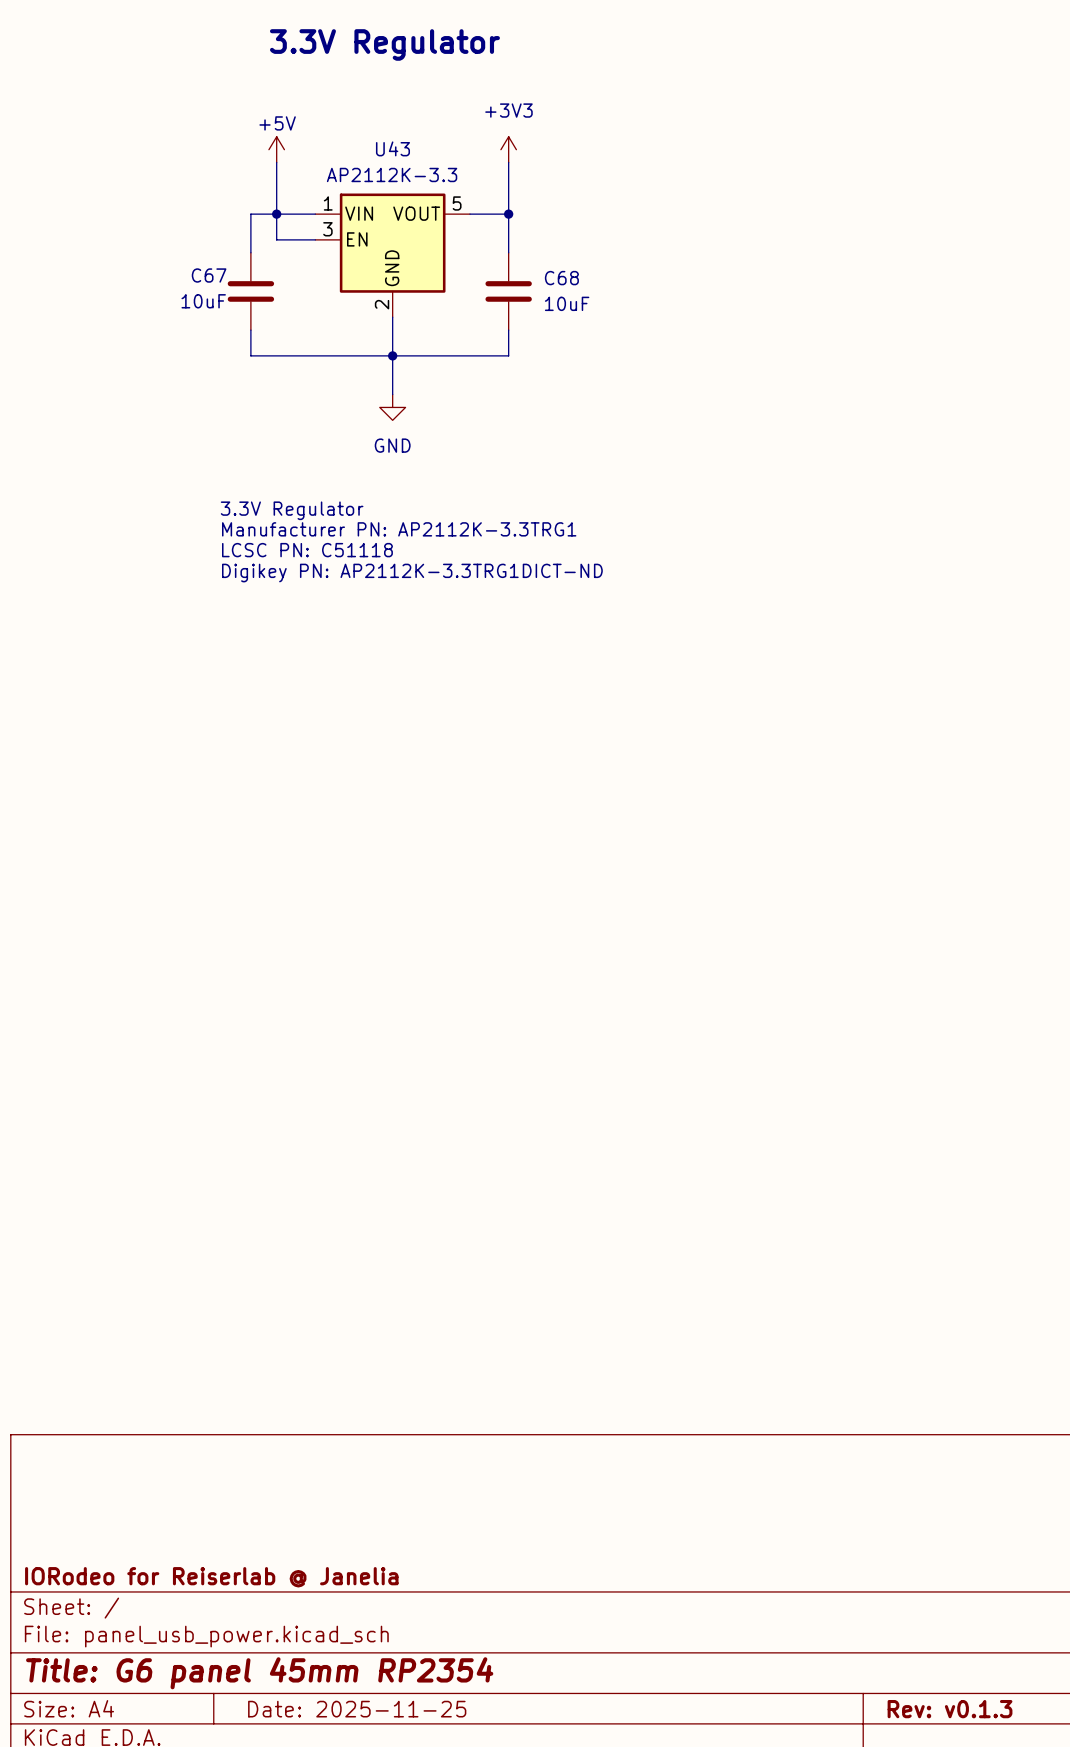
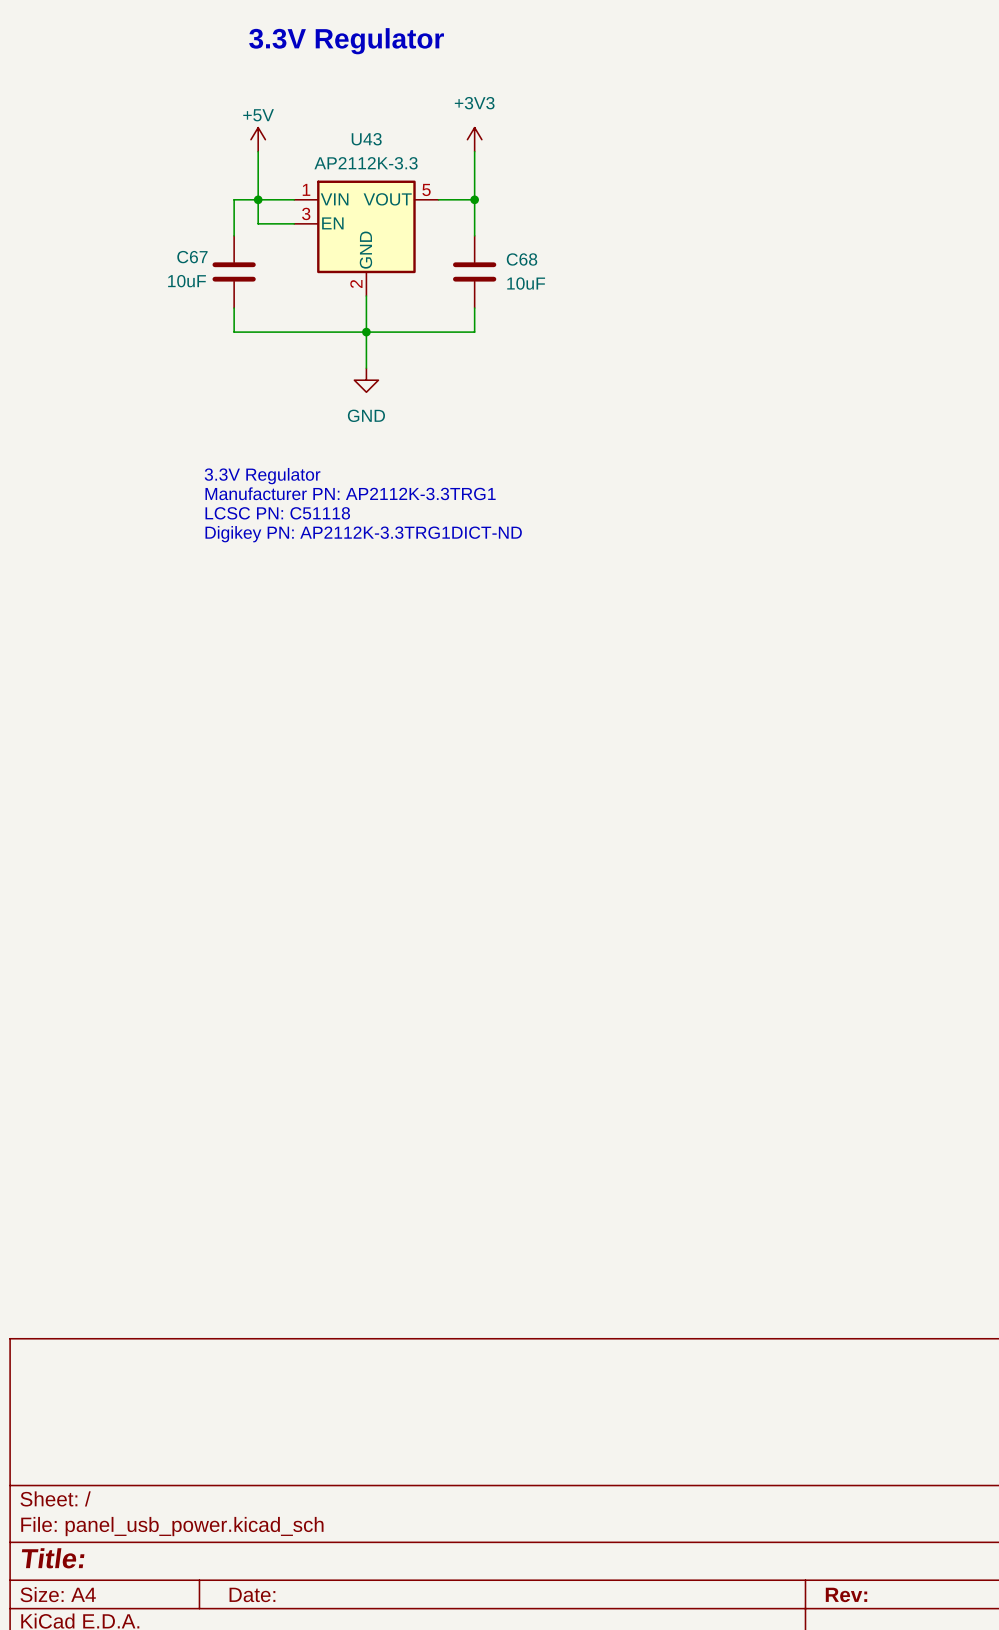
title block: IORodeo for Reiserlab @ Janelia (211, 1577) -> none
title block: Title: G6 panel 45mm RP2354 (259, 1673) -> Title: (53, 1558)
title block: Date: 2025-11-25 (357, 1709) -> Date: (252, 1594)
title block: Rev: v0.1.3 (950, 1709) -> Rev: (846, 1594)

